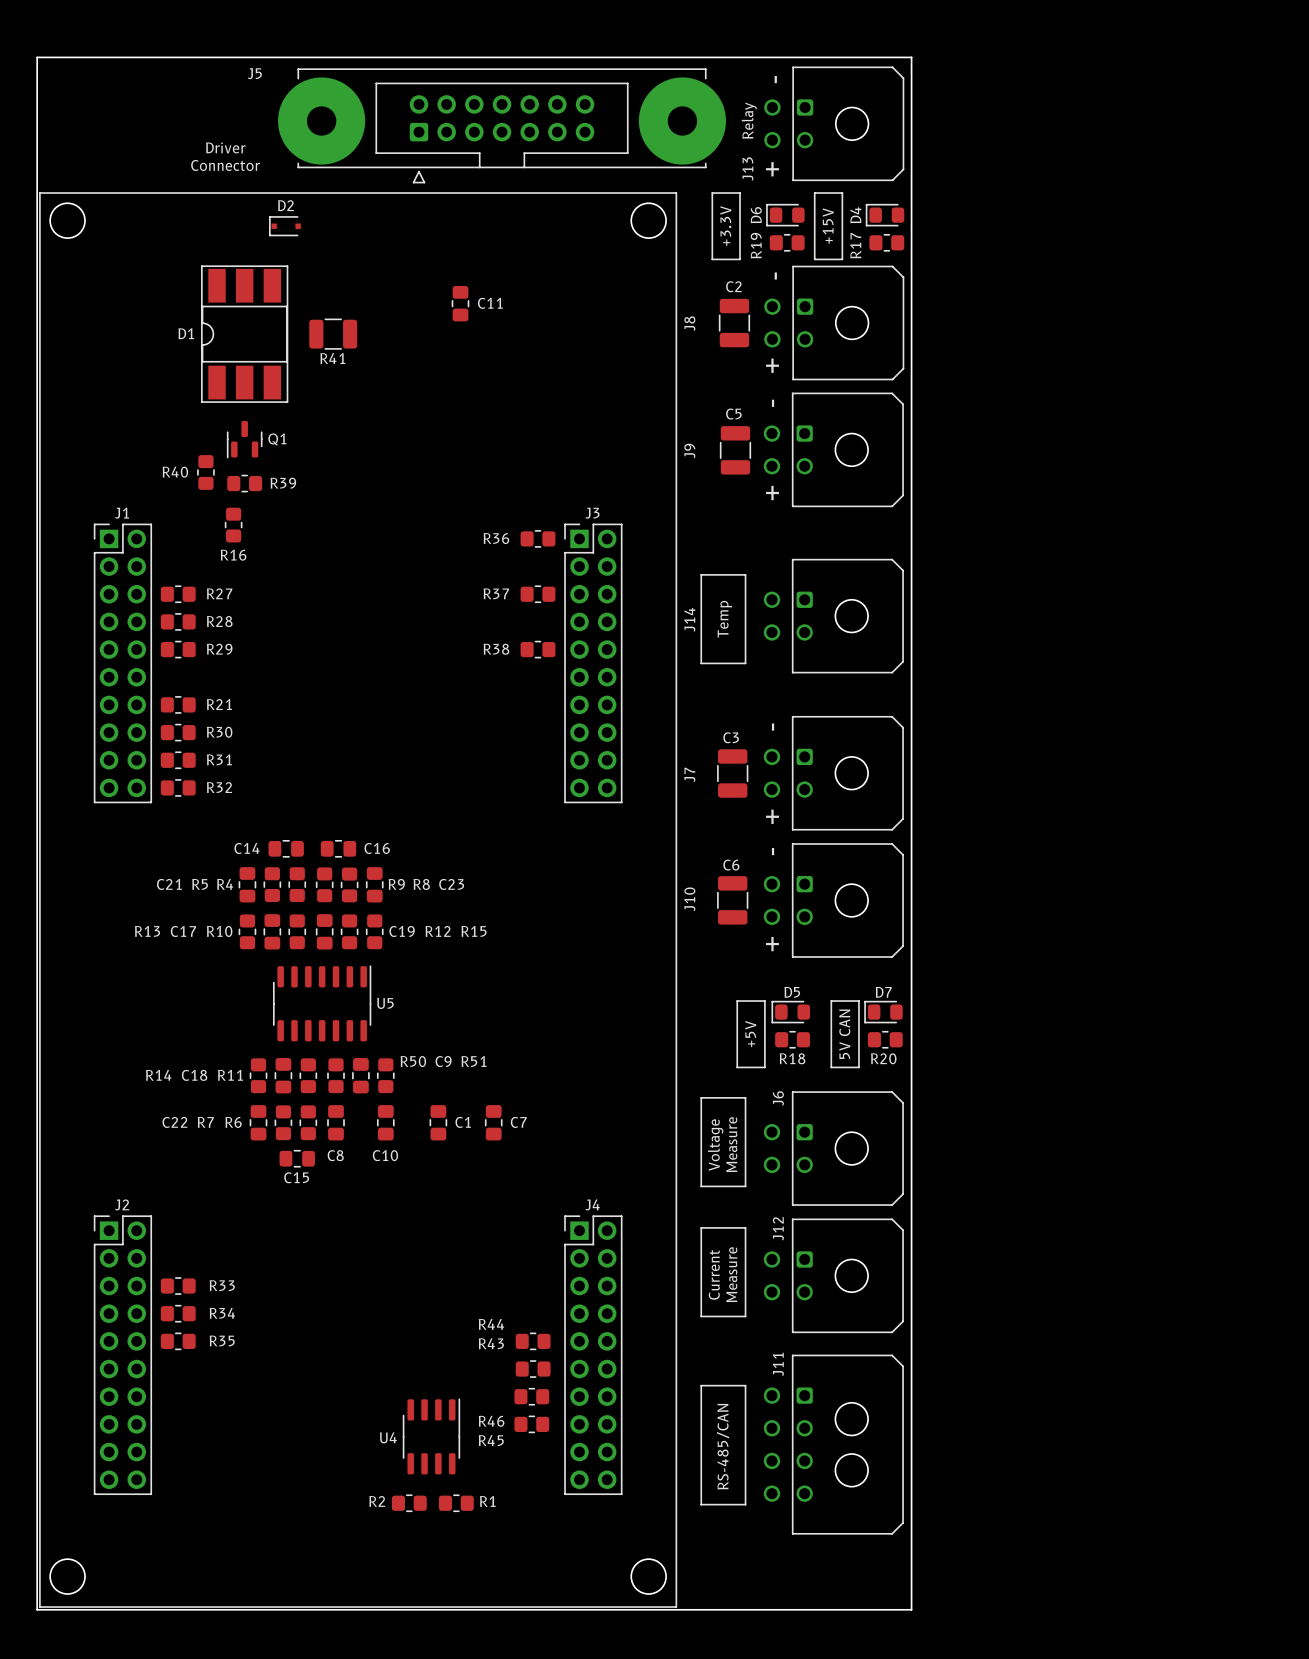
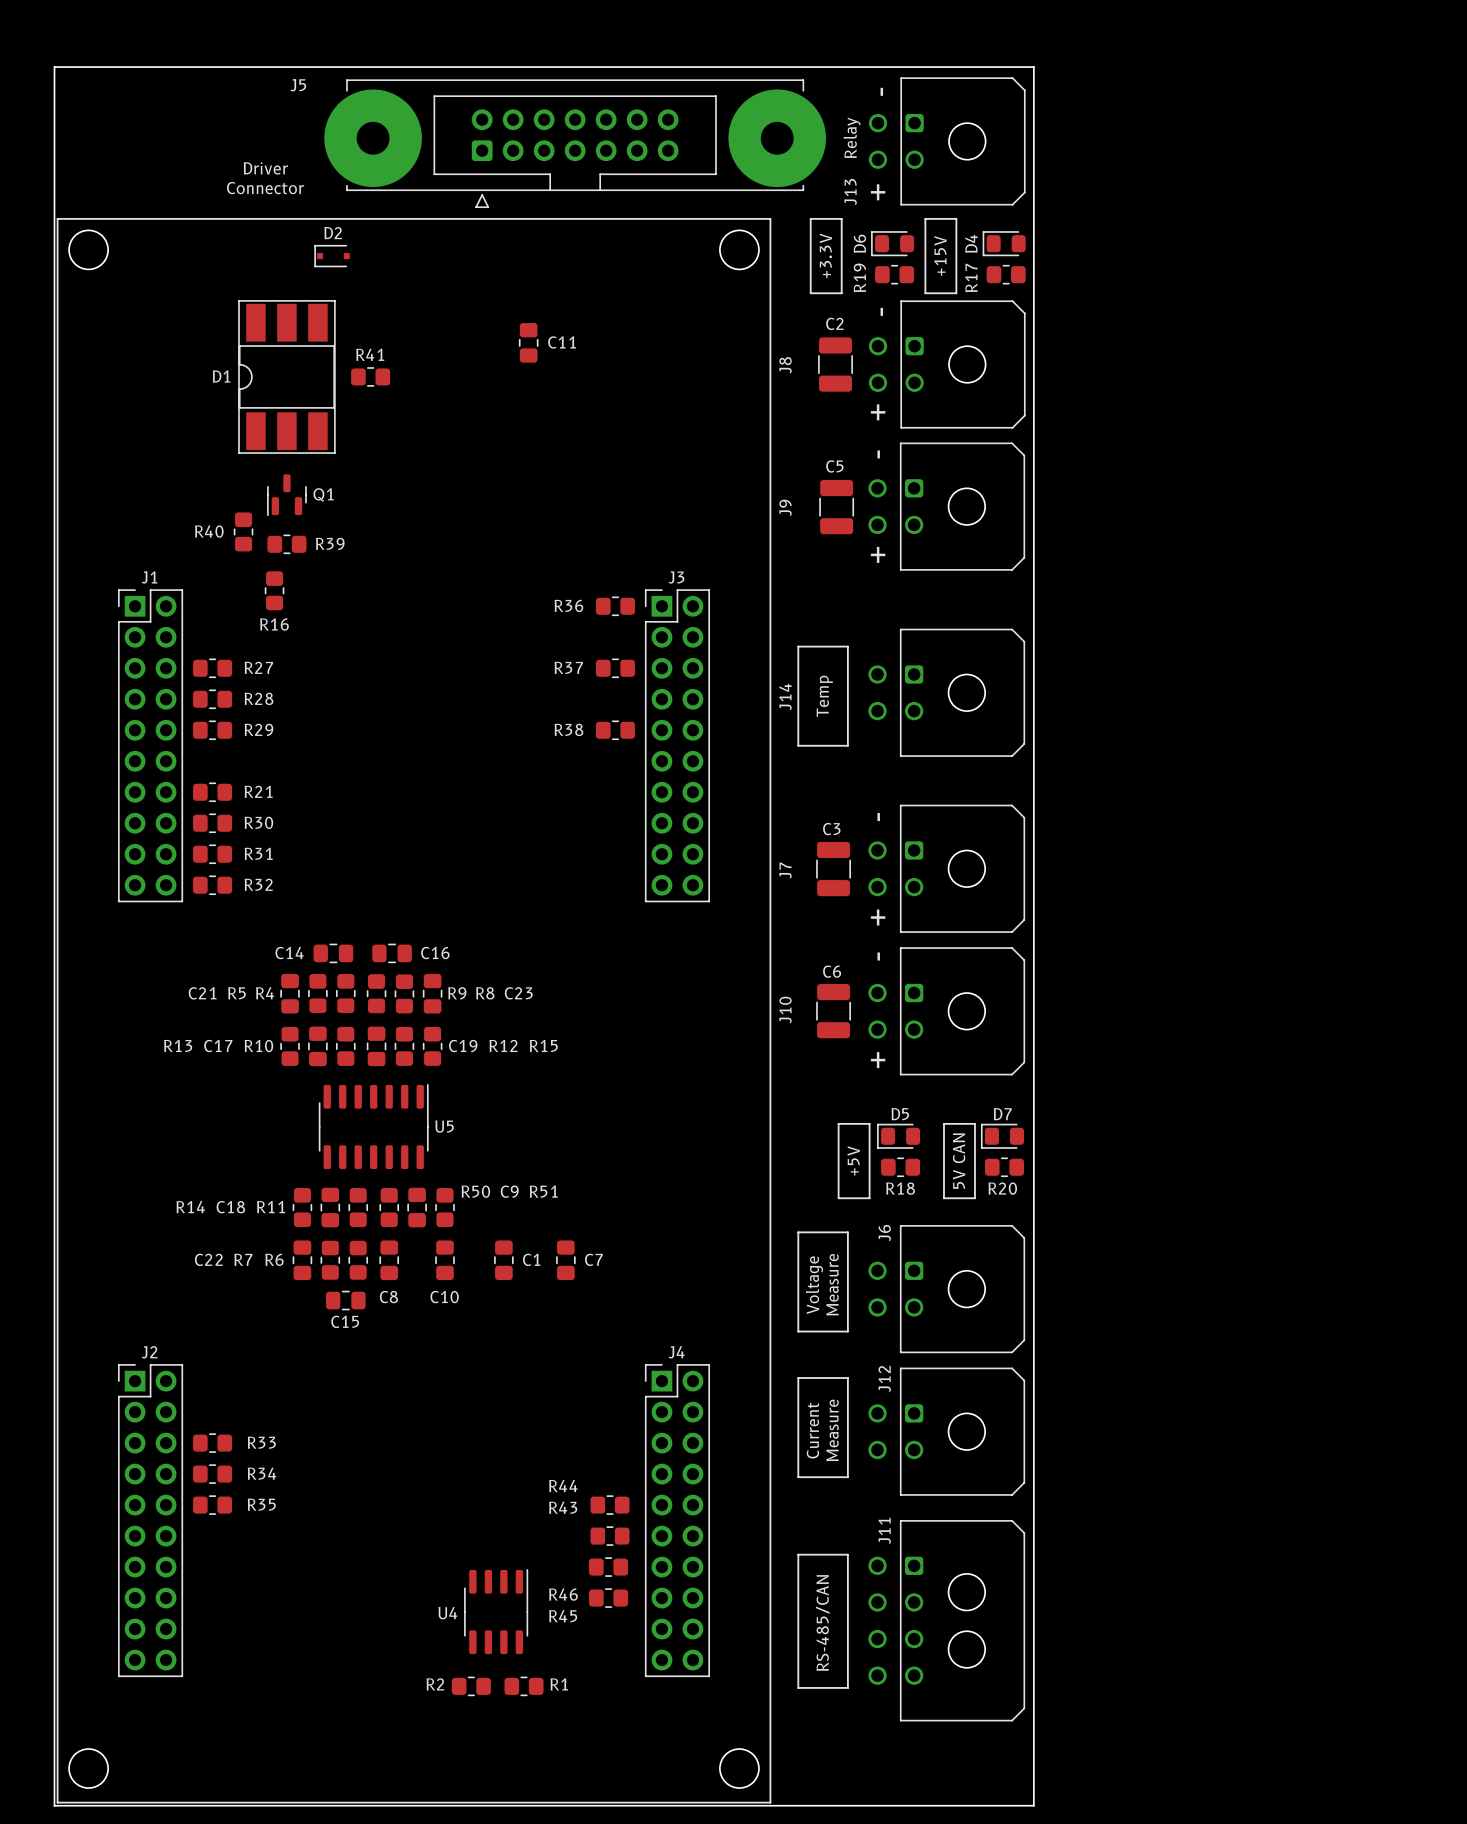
R41 footprint: [309, 318, 358, 350] -> [351, 367, 391, 387]
R41 name position: R41 (332, 358) -> R41 (370, 354)

